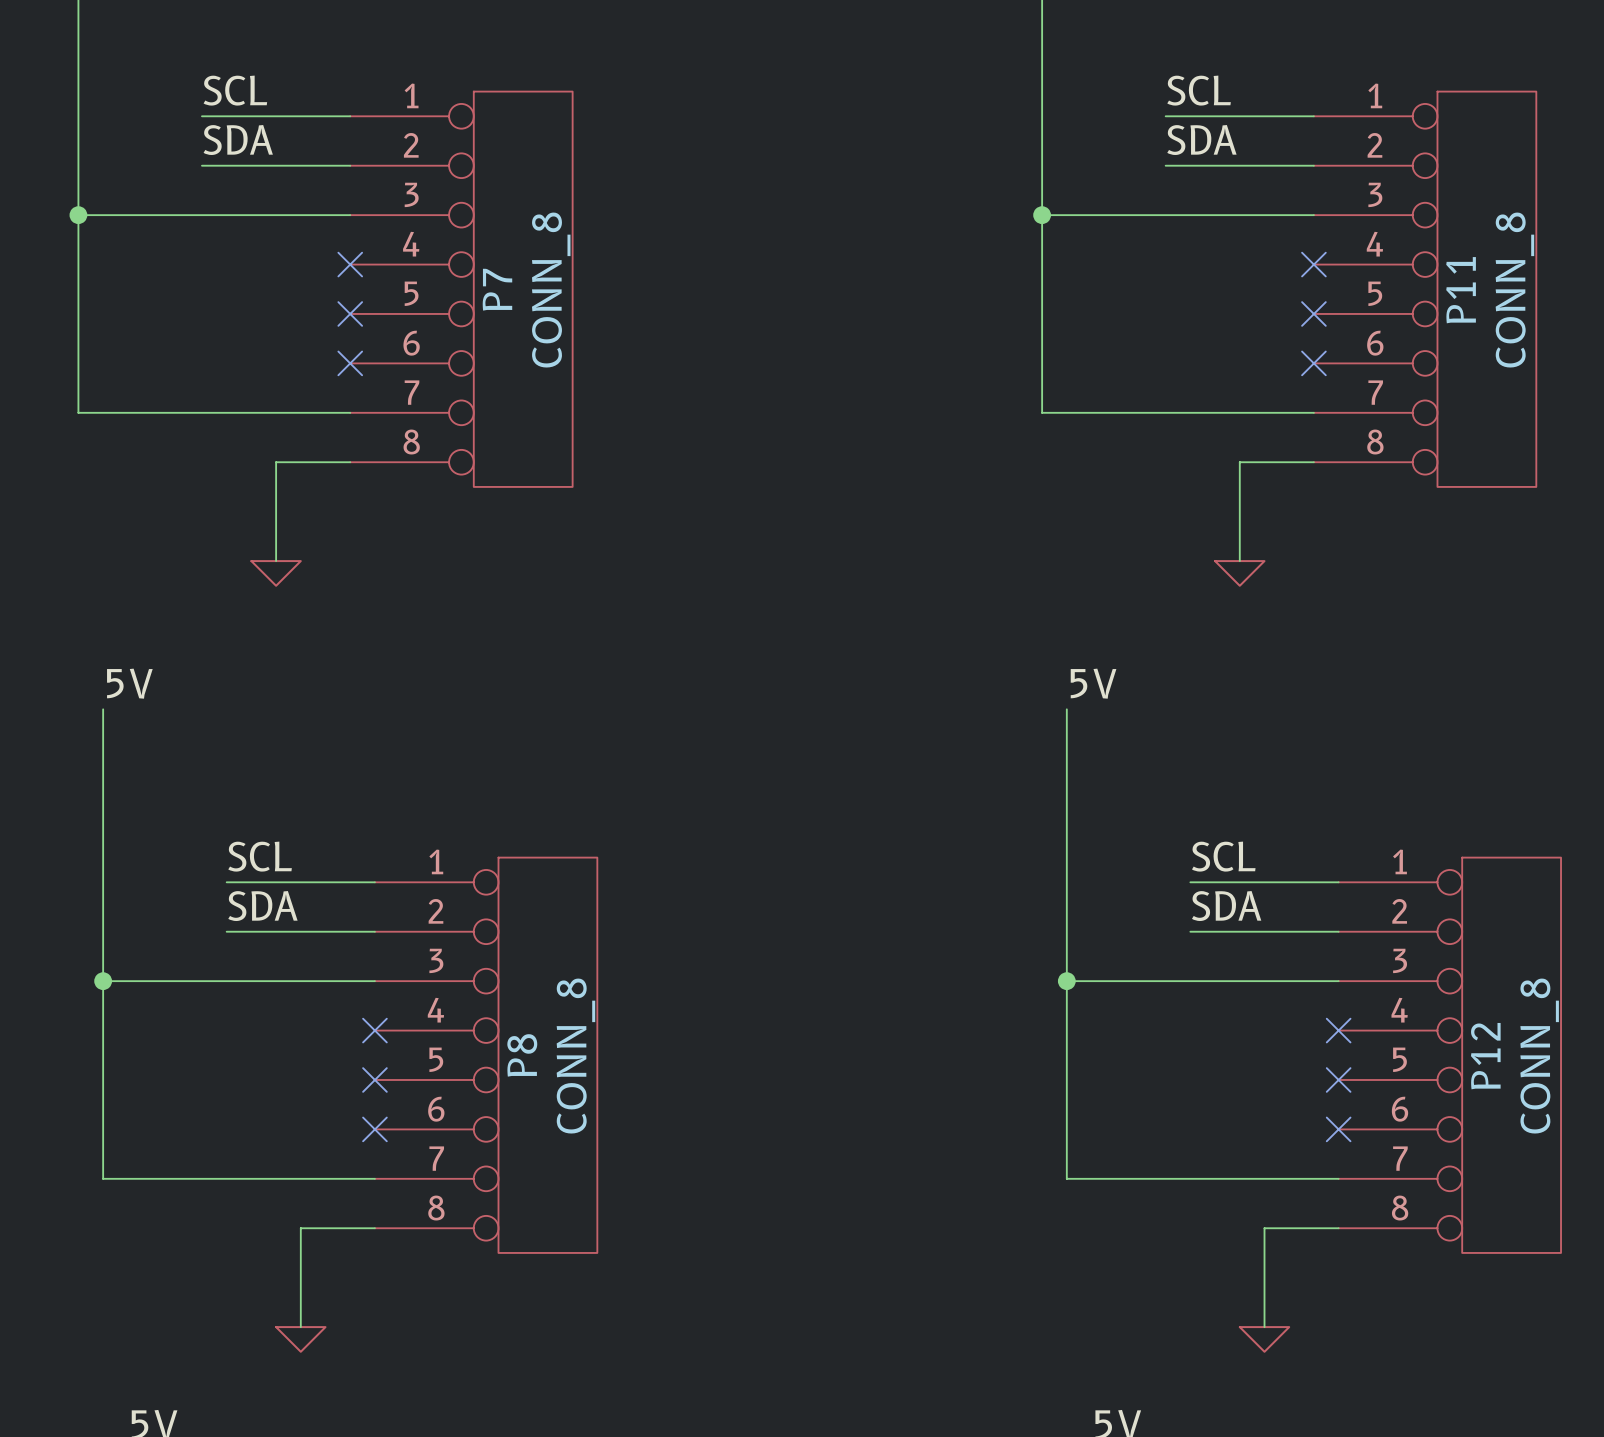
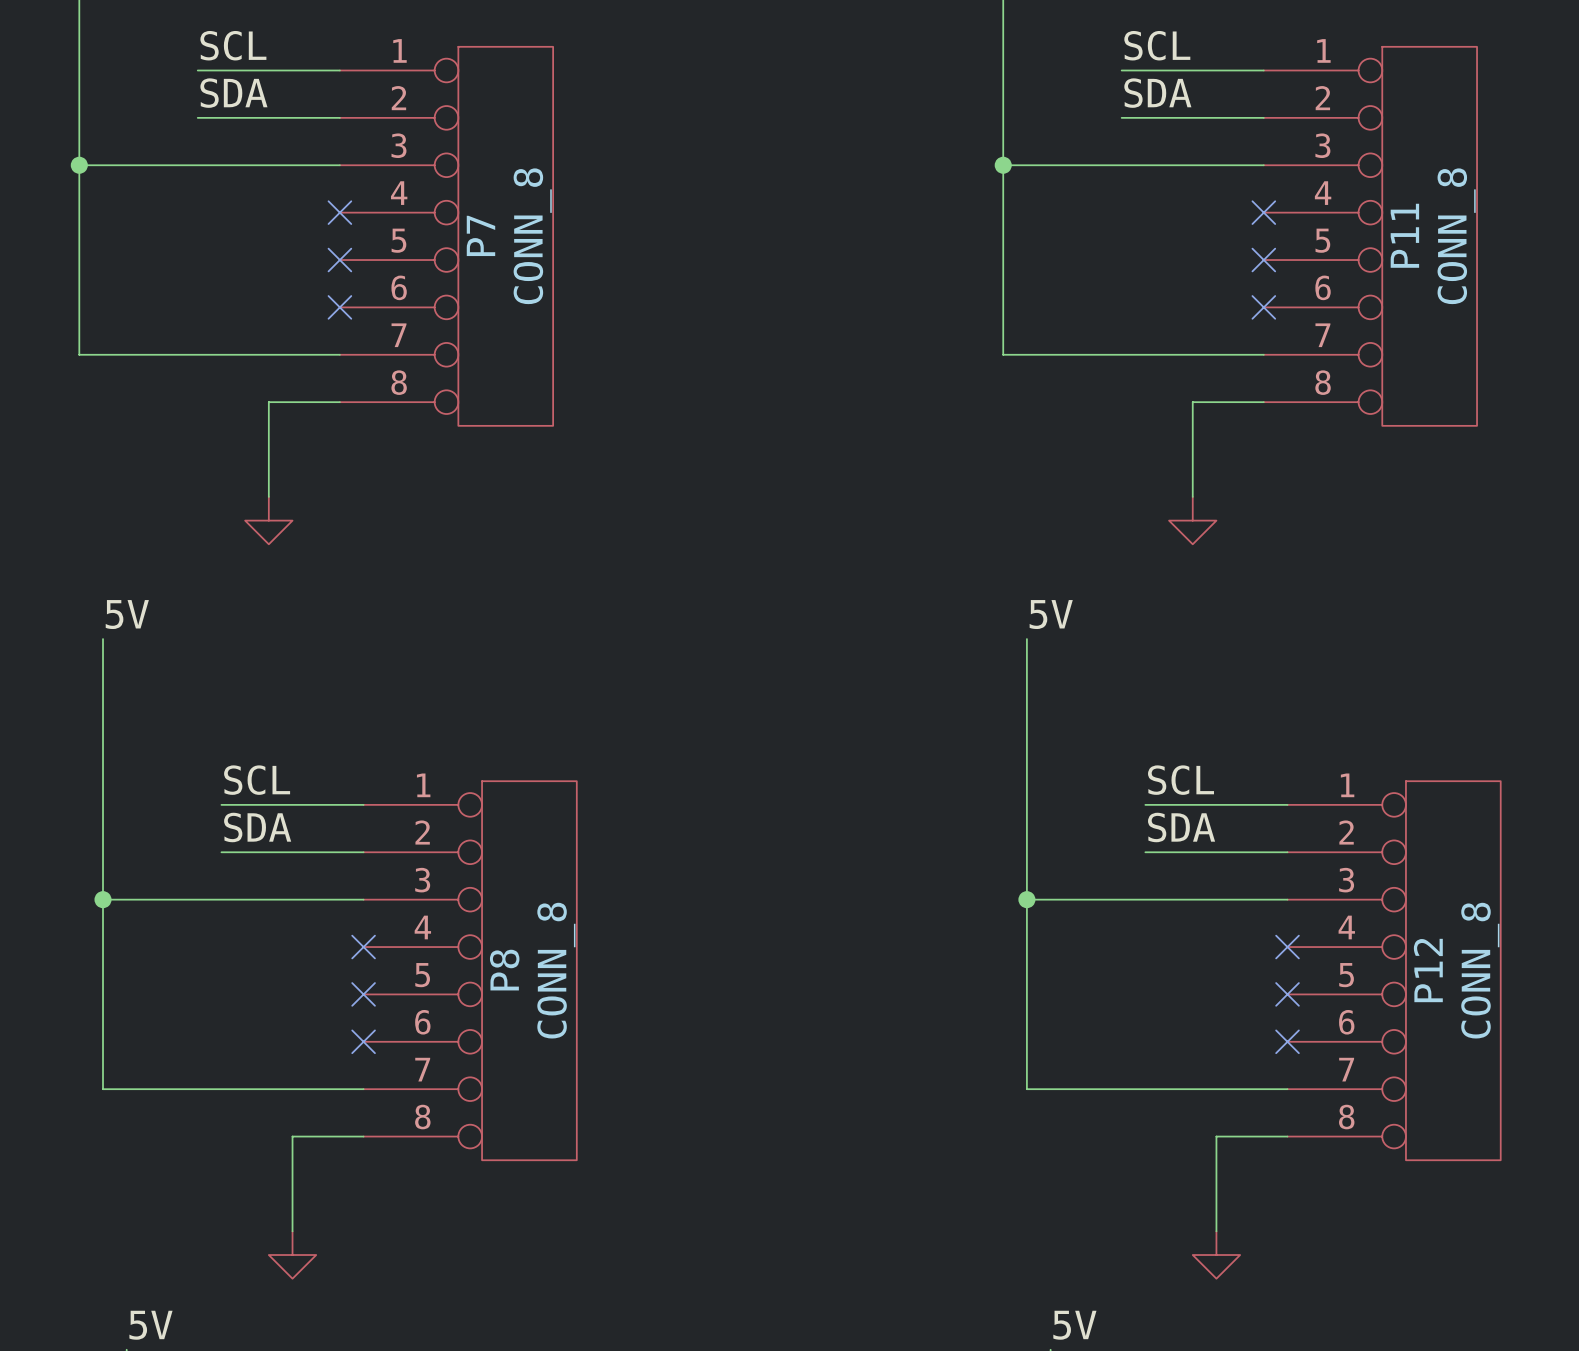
power symbol shape: [250, 560, 302, 587] -> [245, 496, 293, 545]
power symbol shape: [1214, 560, 1266, 587] -> [1169, 496, 1217, 545]
power symbol shape: [275, 1326, 327, 1353] -> [268, 1231, 317, 1279]
power symbol shape: [1238, 1326, 1291, 1353] -> [1192, 1231, 1241, 1279]

